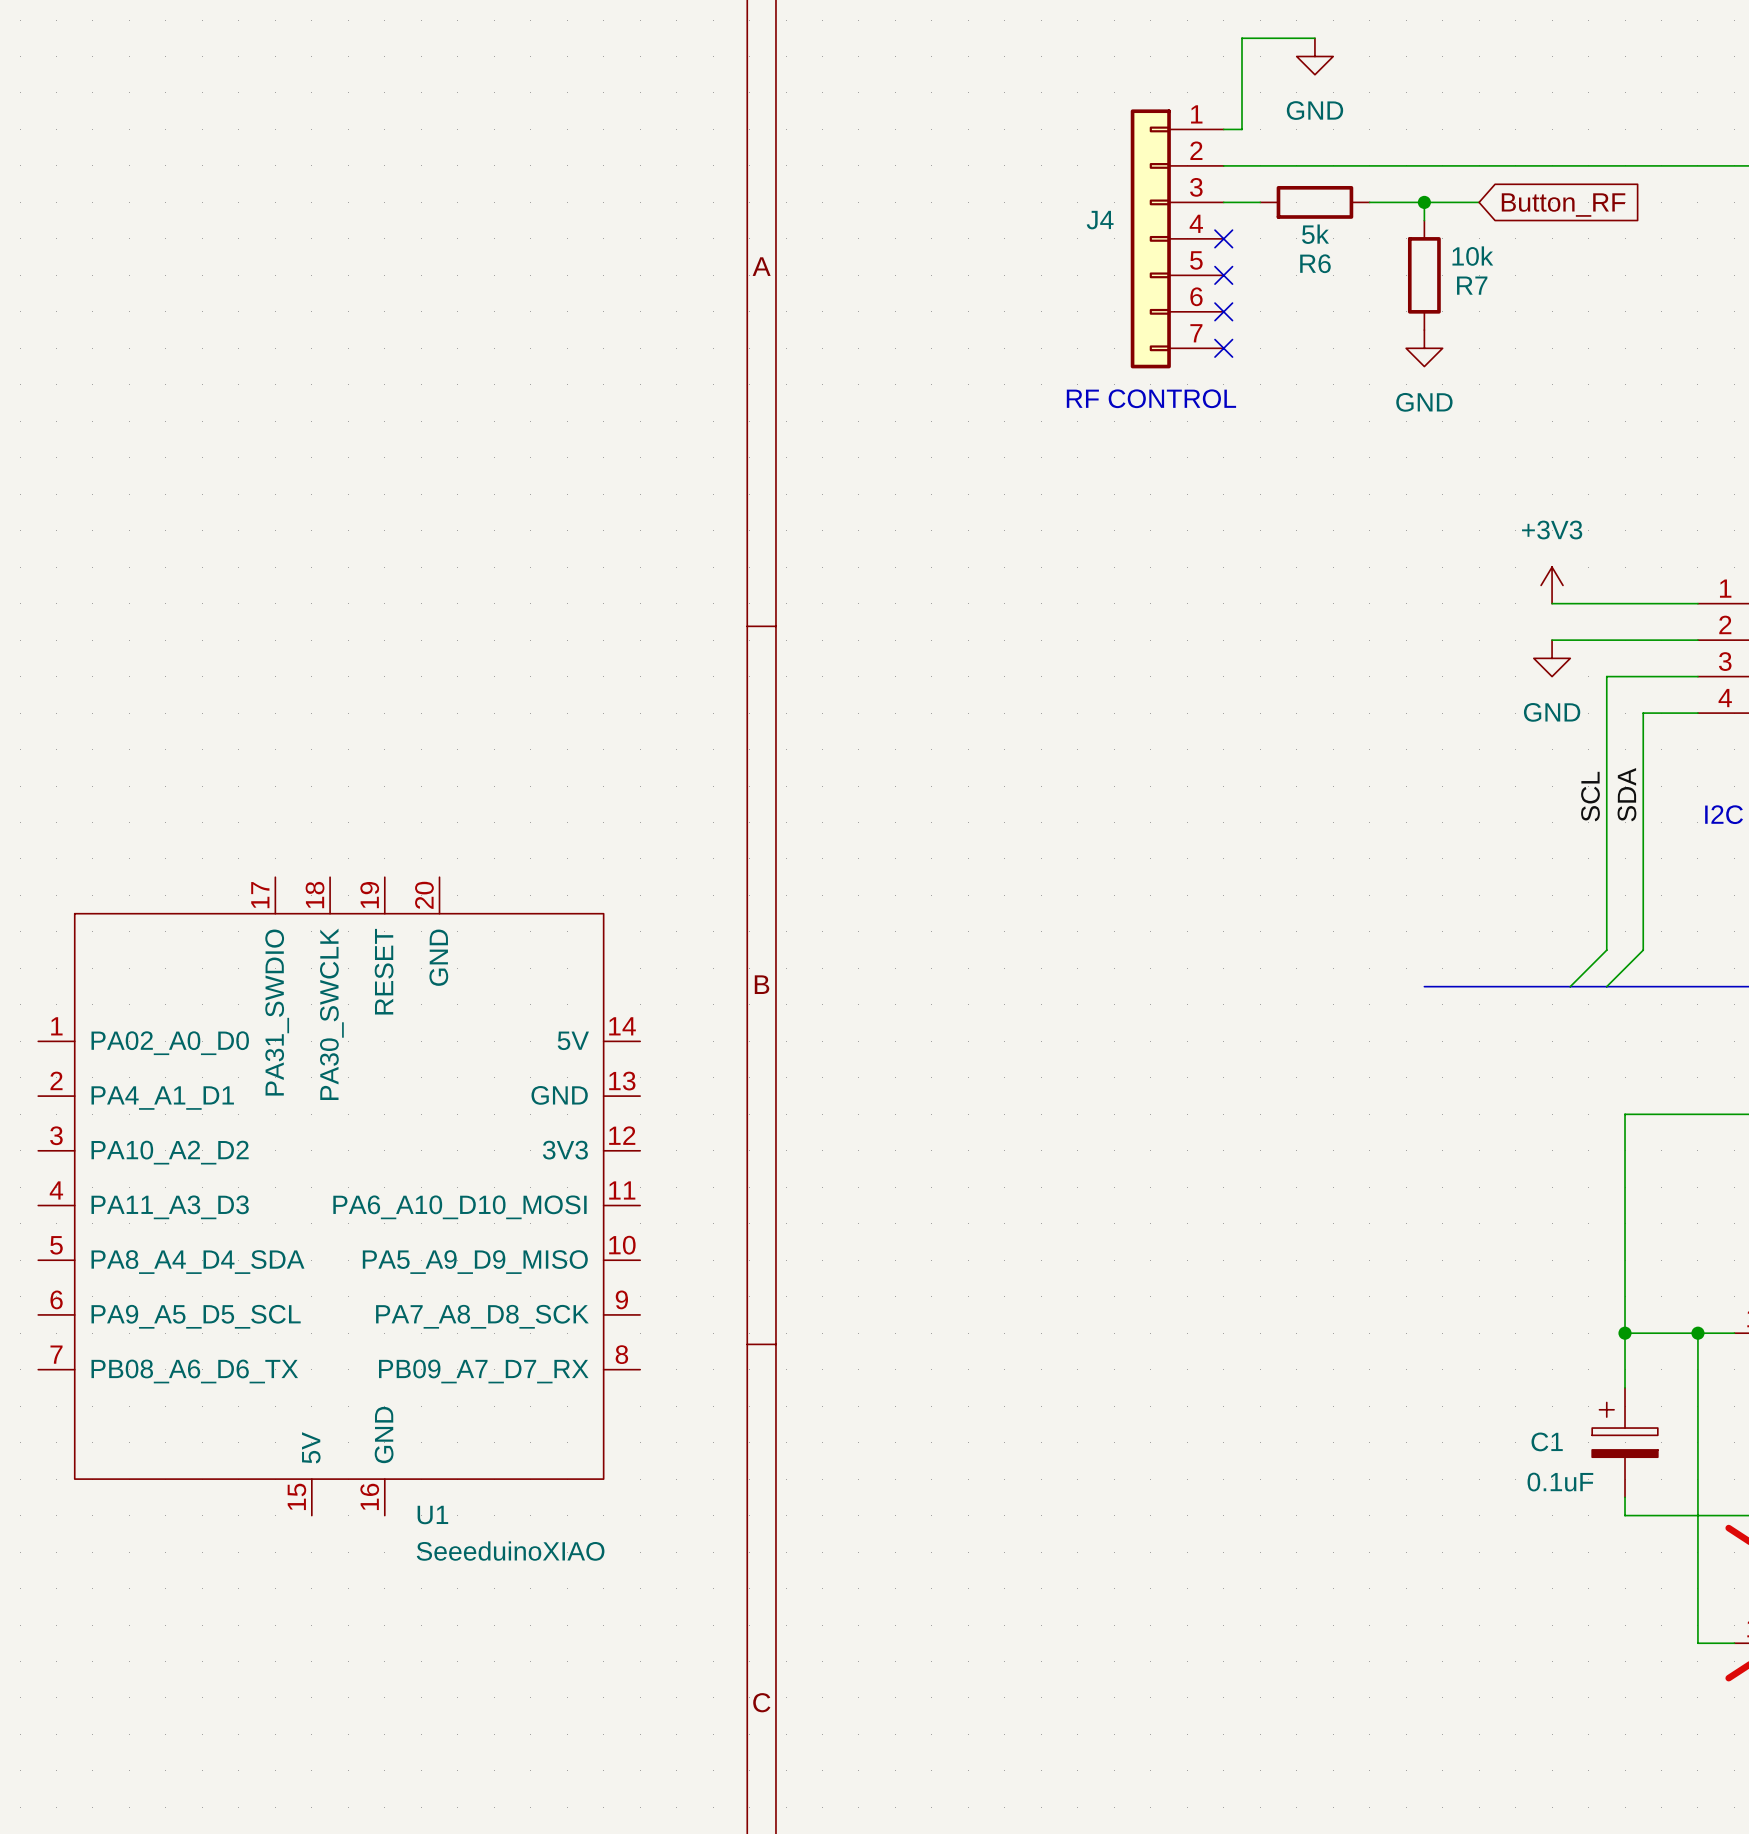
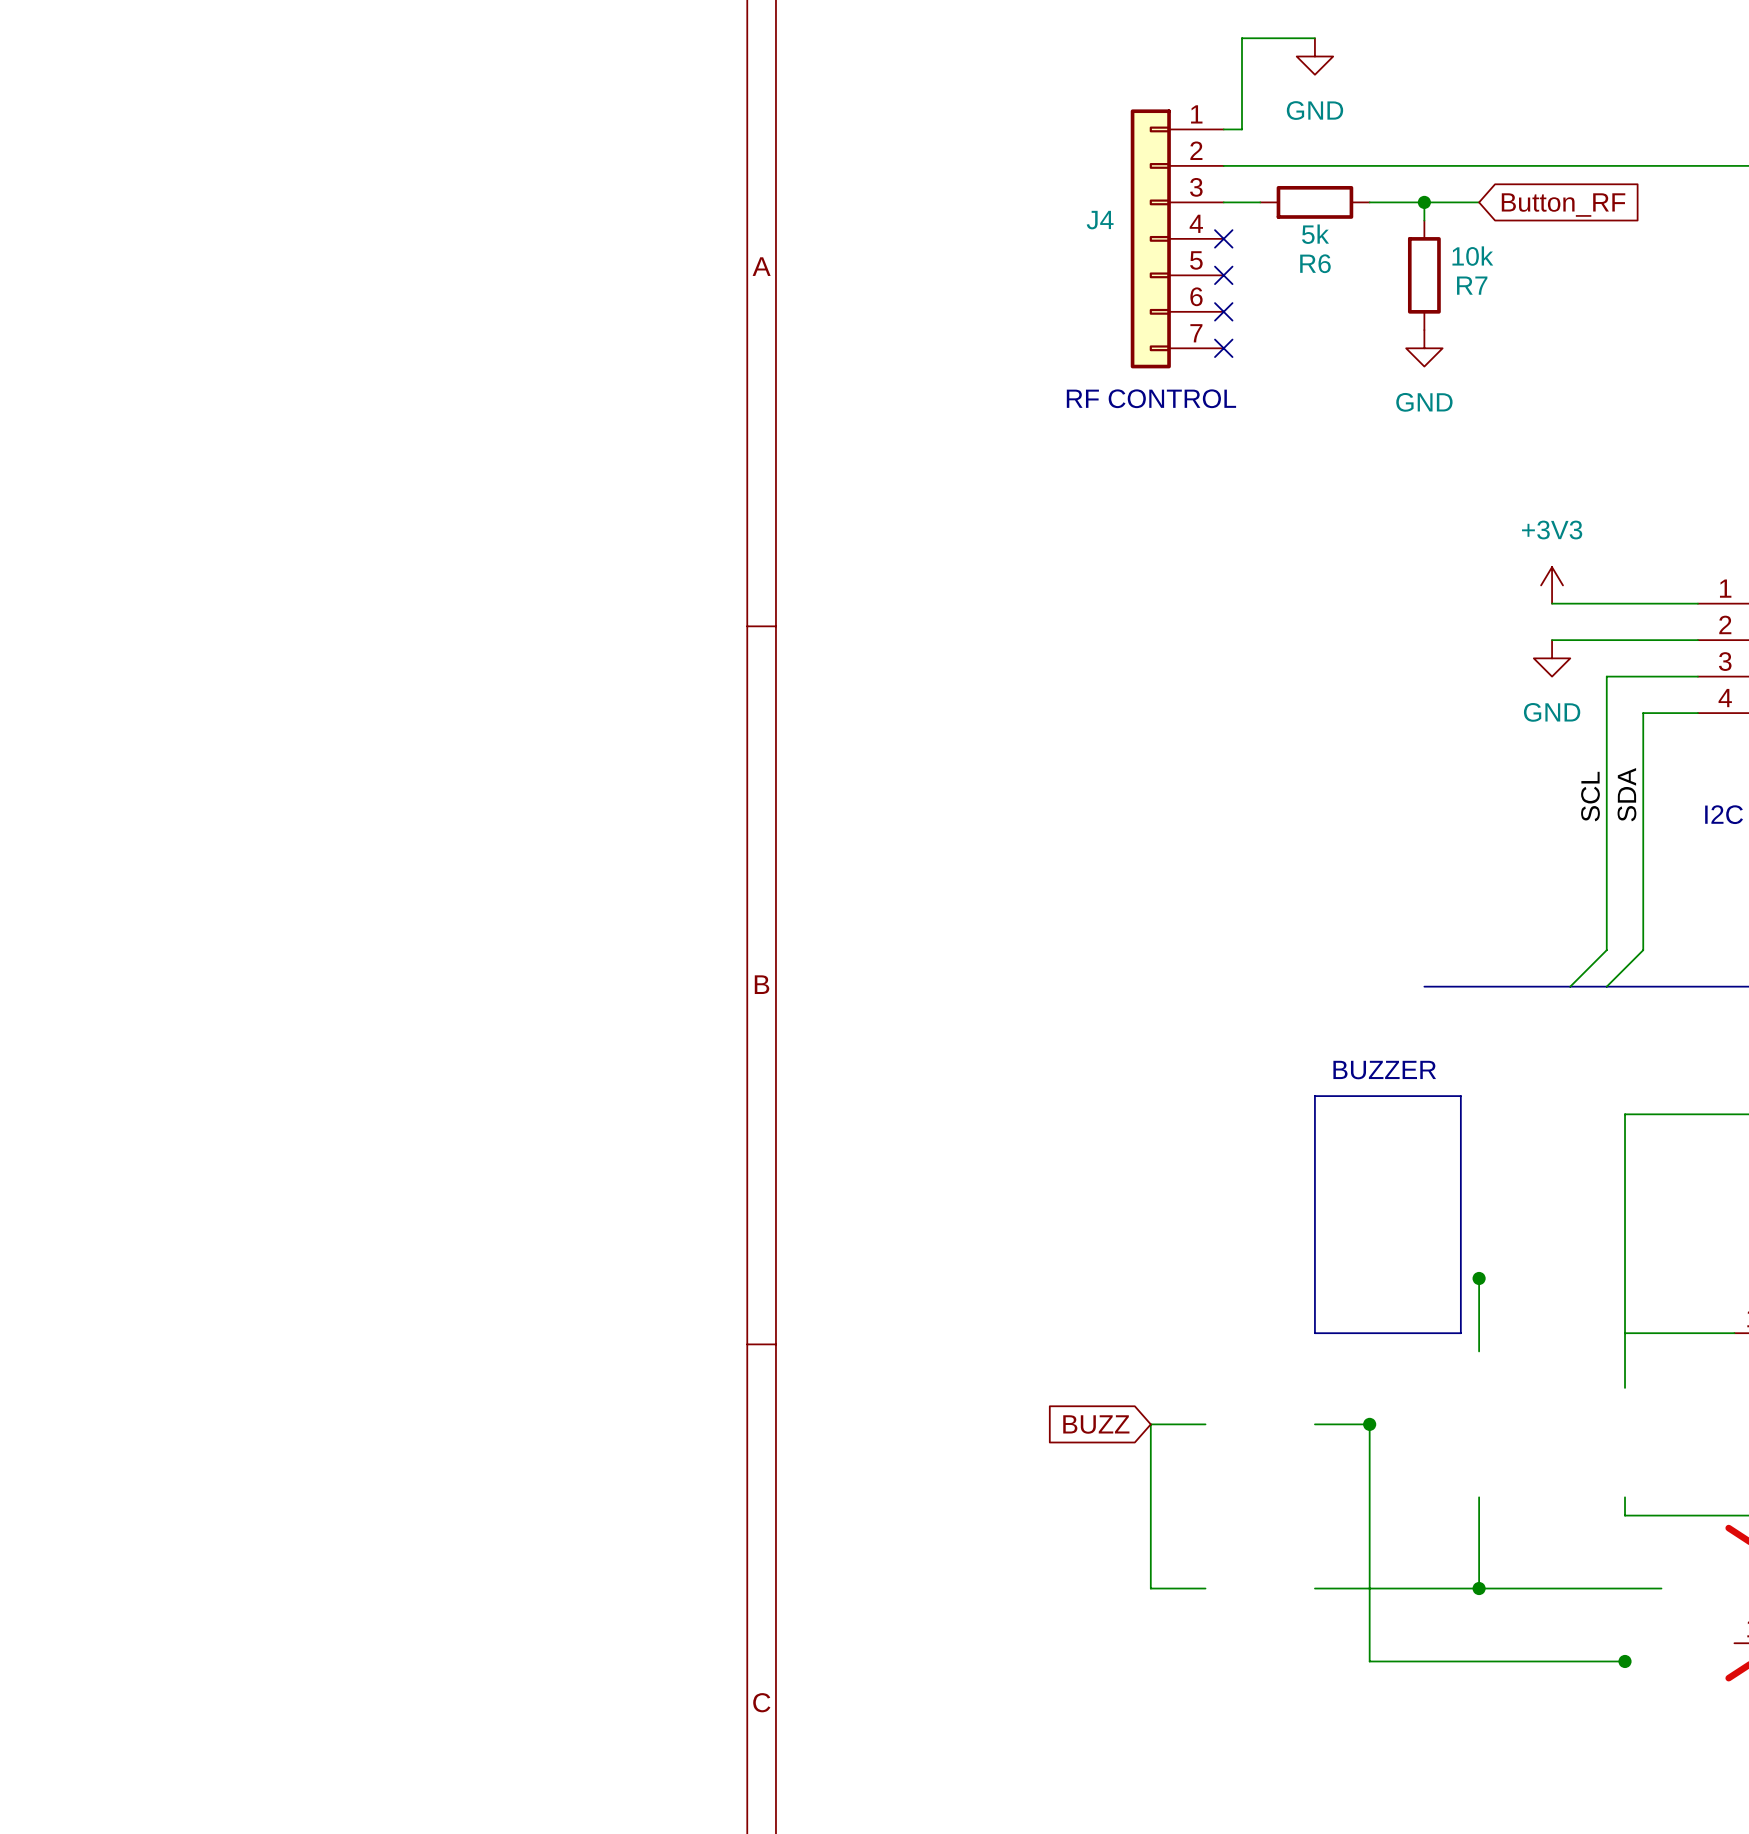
text: none -> BUZZER (1384, 1070)
line: none -> (1314, 1096) (1460, 1096) (1460, 1333) (1314, 1333) (1314, 1096)
U1: SeeeduinoXIAO (339, 1196) -> none
wire: none -> (1479, 1278) (1479, 1351)
junction: none -> (1479, 1278)
junction: (1625, 1333) -> none
wire: (1697, 1333) (1697, 1643) (1734, 1643) -> none
junction: (1697, 1333) -> none
global label: none -> BUZZ (1096, 1424)
wire: none -> (1205, 1424) (1150, 1424) (1150, 1588) (1205, 1588)
wire: none -> (1314, 1424) (1369, 1424) (1369, 1661) (1625, 1661)
junction: none -> (1369, 1424)
C1: 0.1uF (1625, 1442) -> none
wire: none -> (1479, 1497) (1479, 1588)
wire: none -> (1314, 1588) (1661, 1588)
junction: none -> (1479, 1588)
junction: none -> (1625, 1661)

